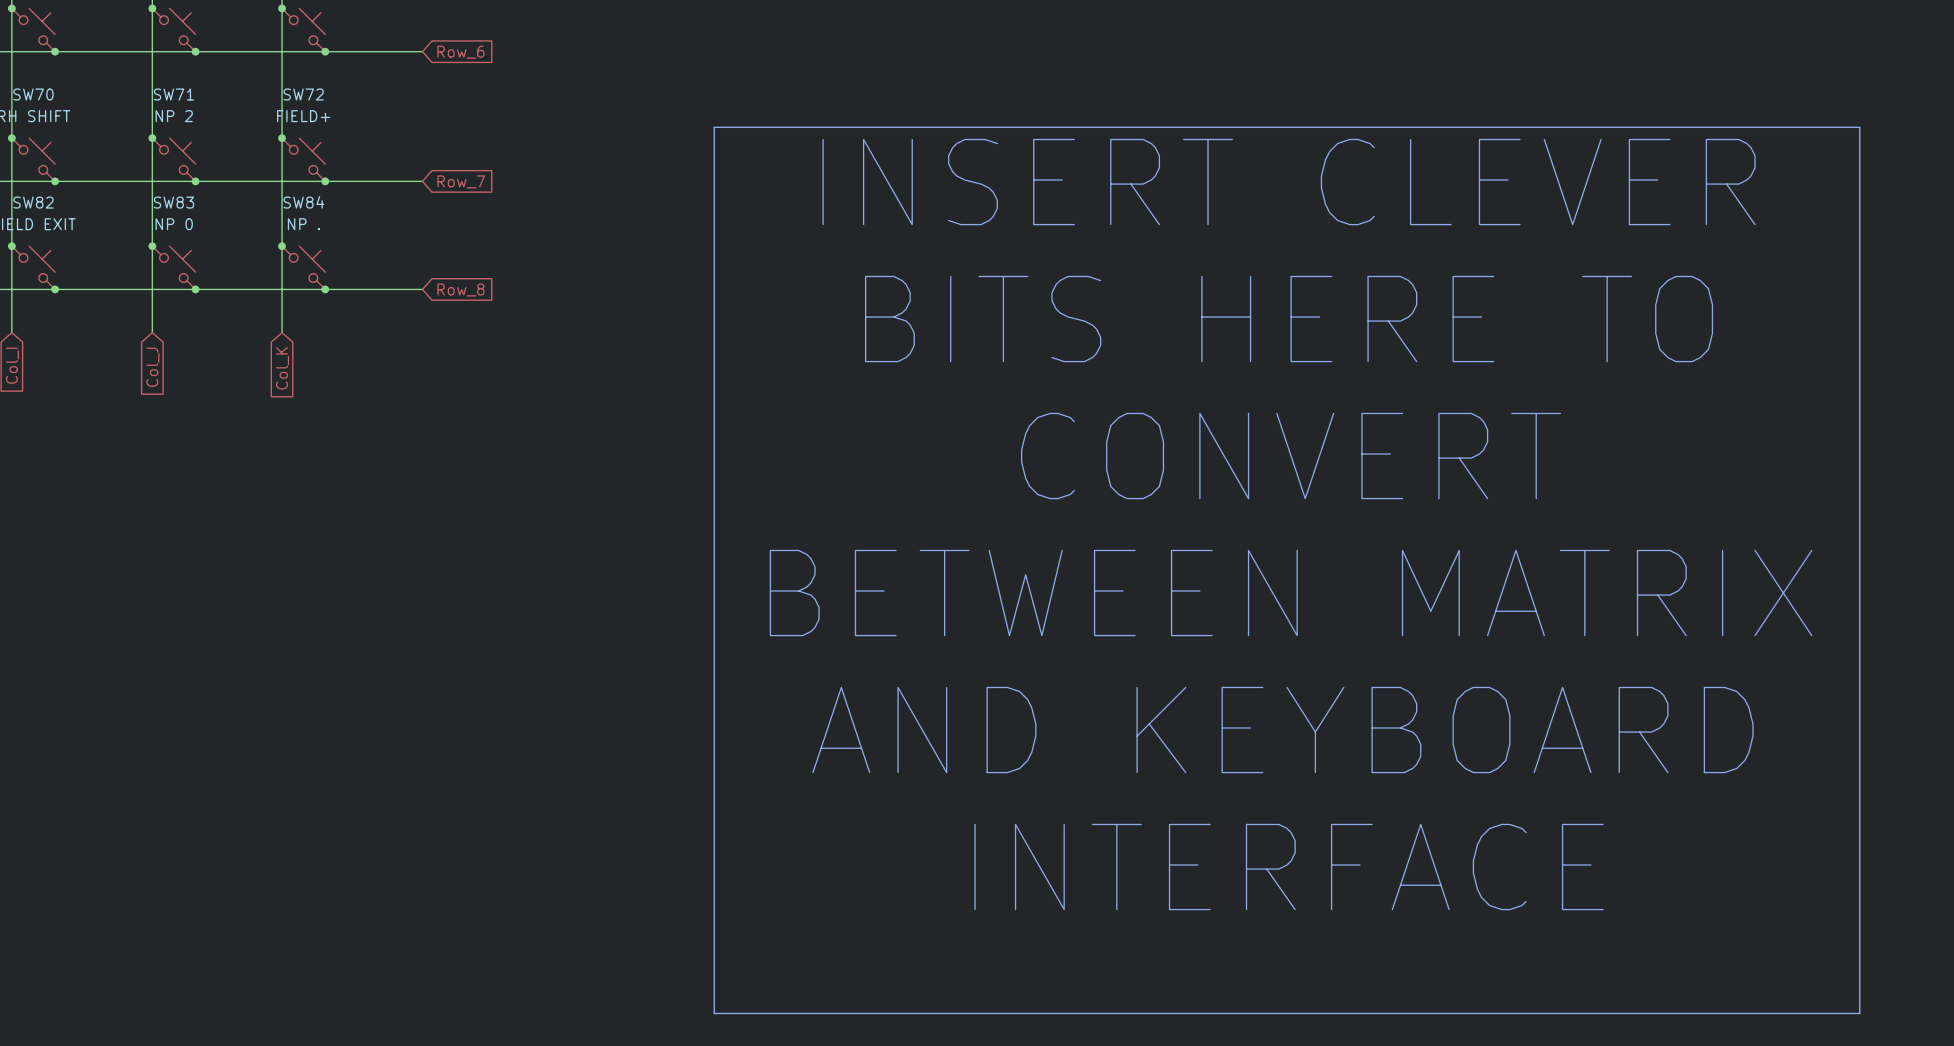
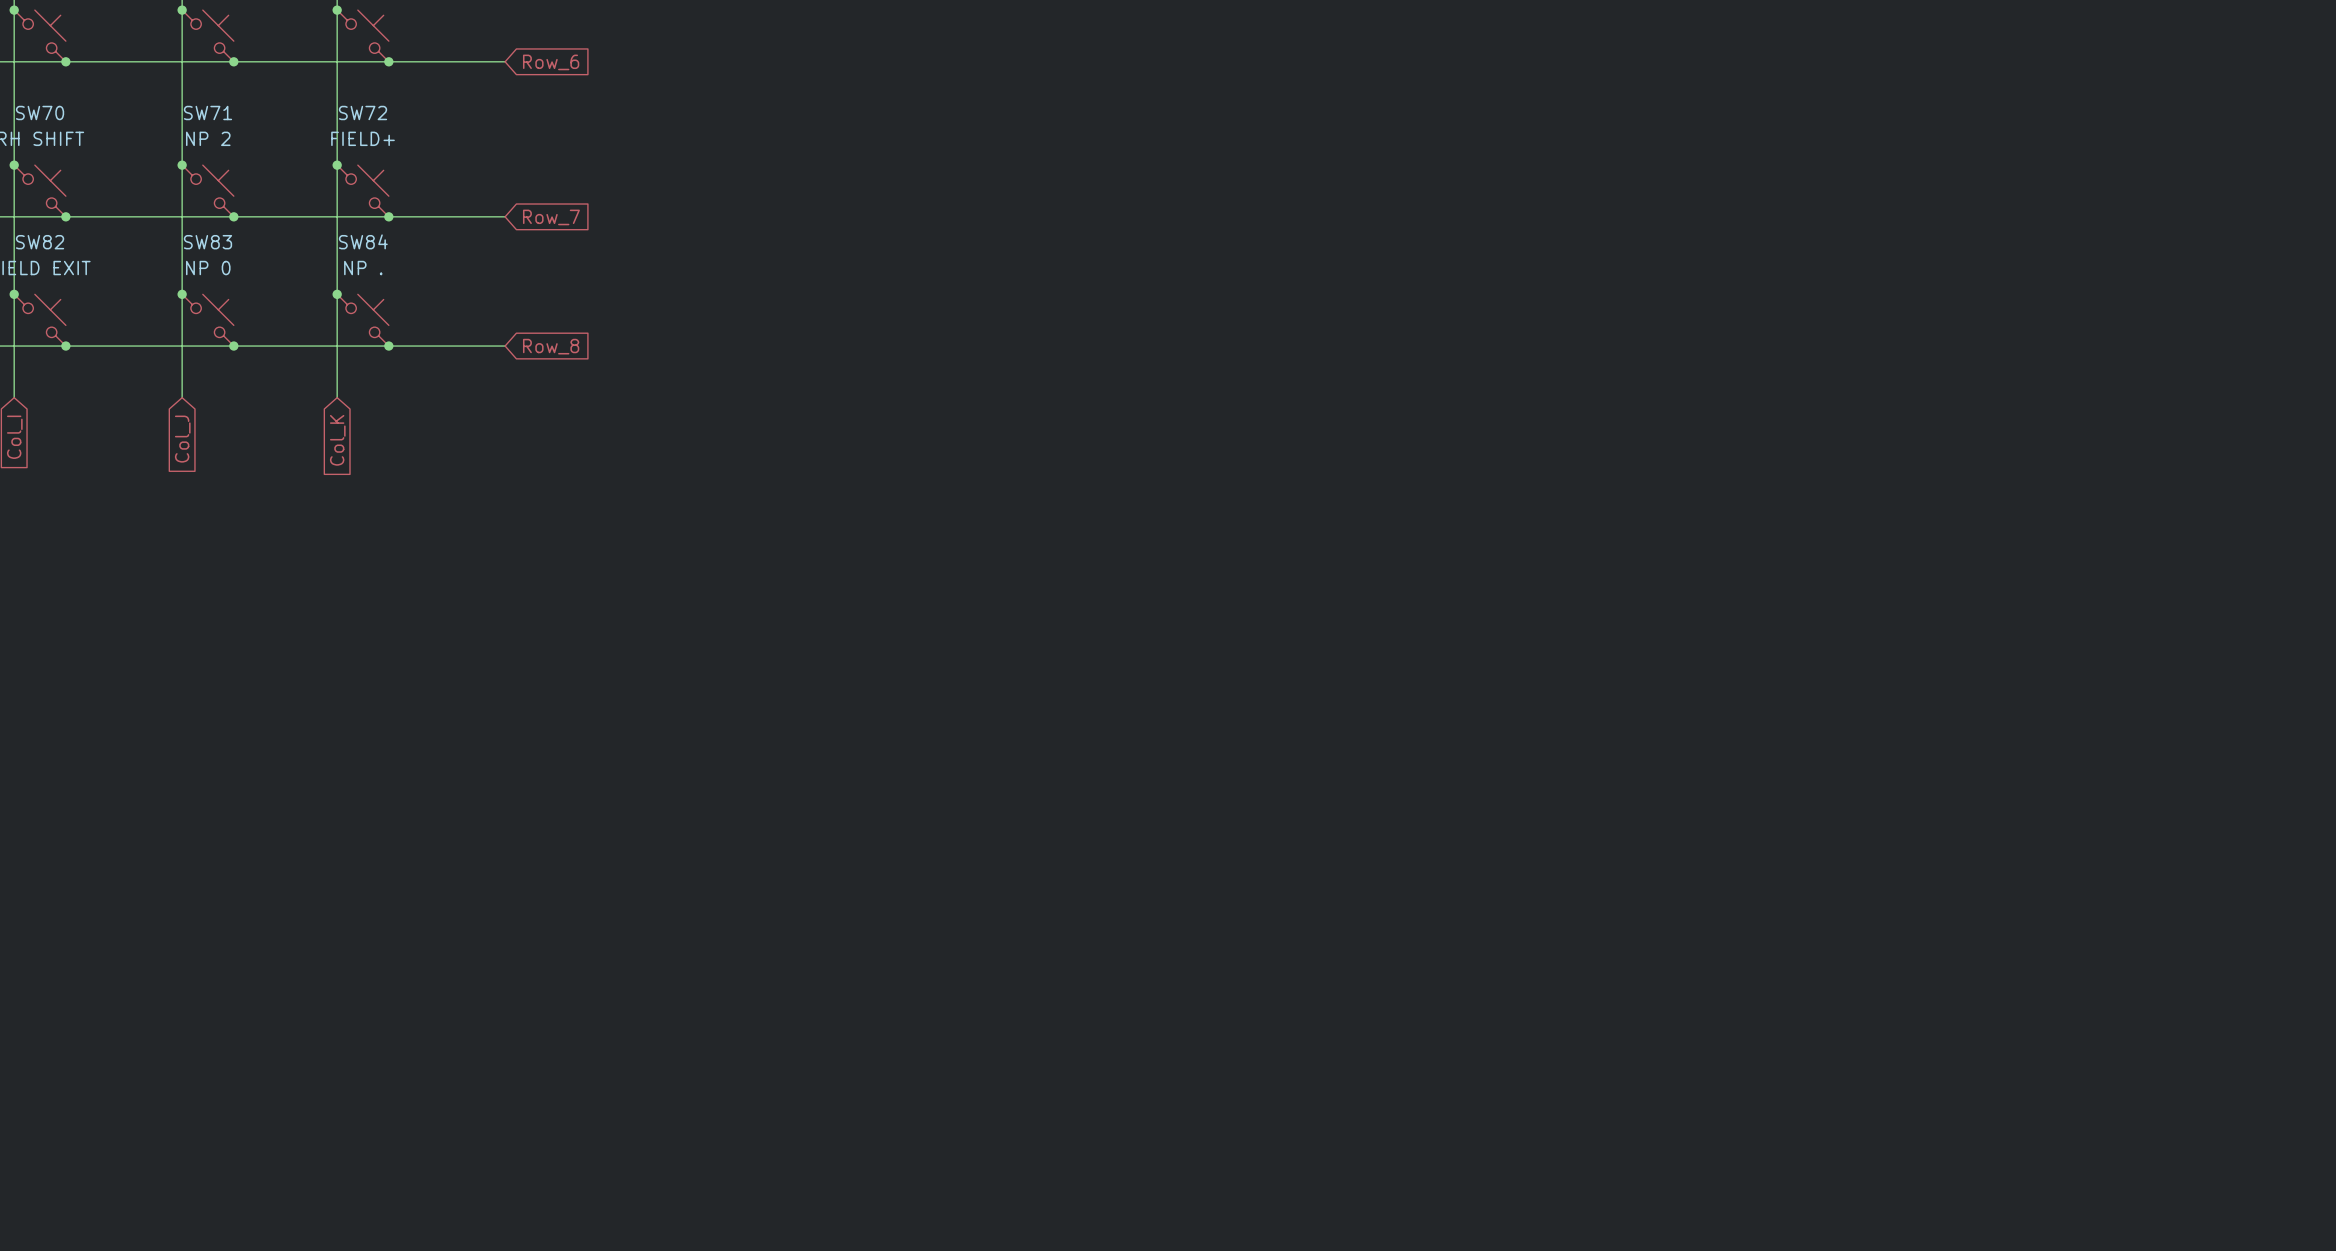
line: (714, 127) (1859, 127) (1859, 1013) (714, 1013) (714, 127) -> none
text: INSERT CLEVER (1289, 182) -> none
text: BITS HERE TO (1289, 319) -> none
text: CONVERT (1291, 456) -> none
text: BETWEEN MATRIX (1291, 593) -> none
text: AND KEYBOARD (1282, 730) -> none
text: INTERFACE (1289, 867) -> none

